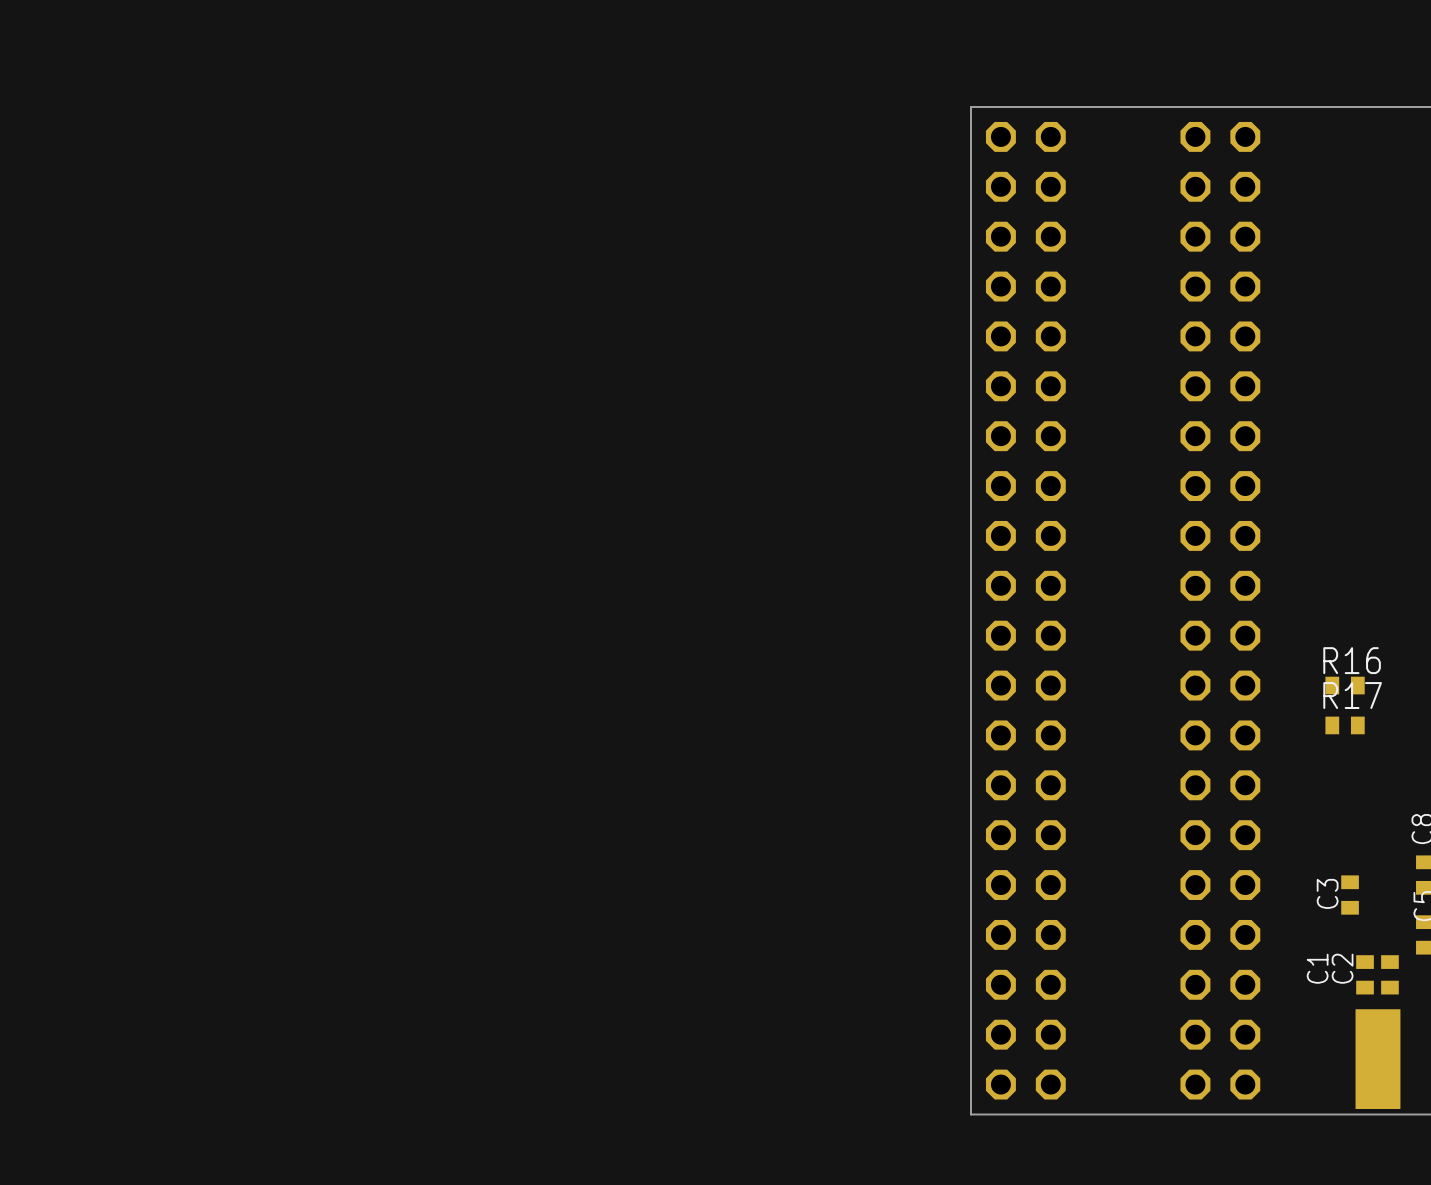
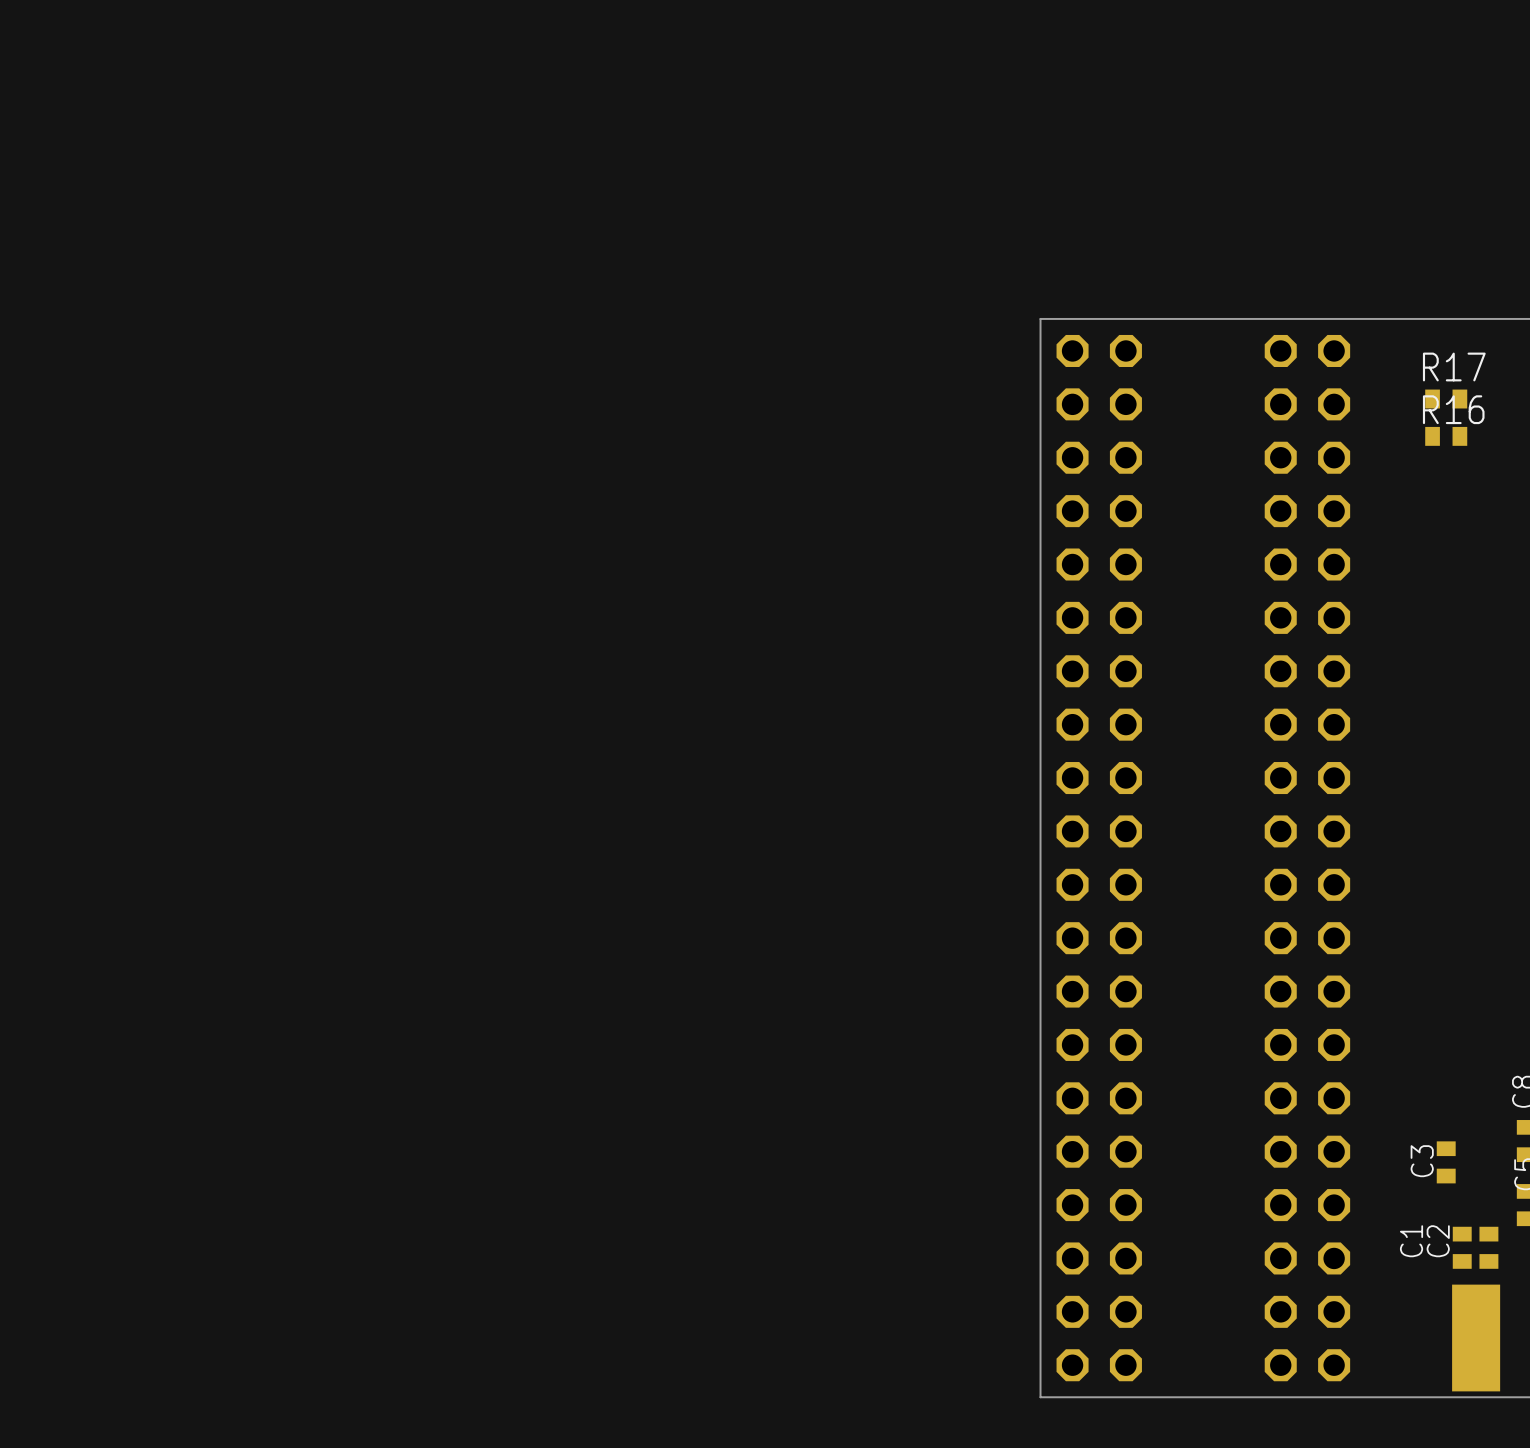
R16 position: (1345, 685) -> (1446, 436)
R17 position: (1345, 725) -> (1446, 399)

